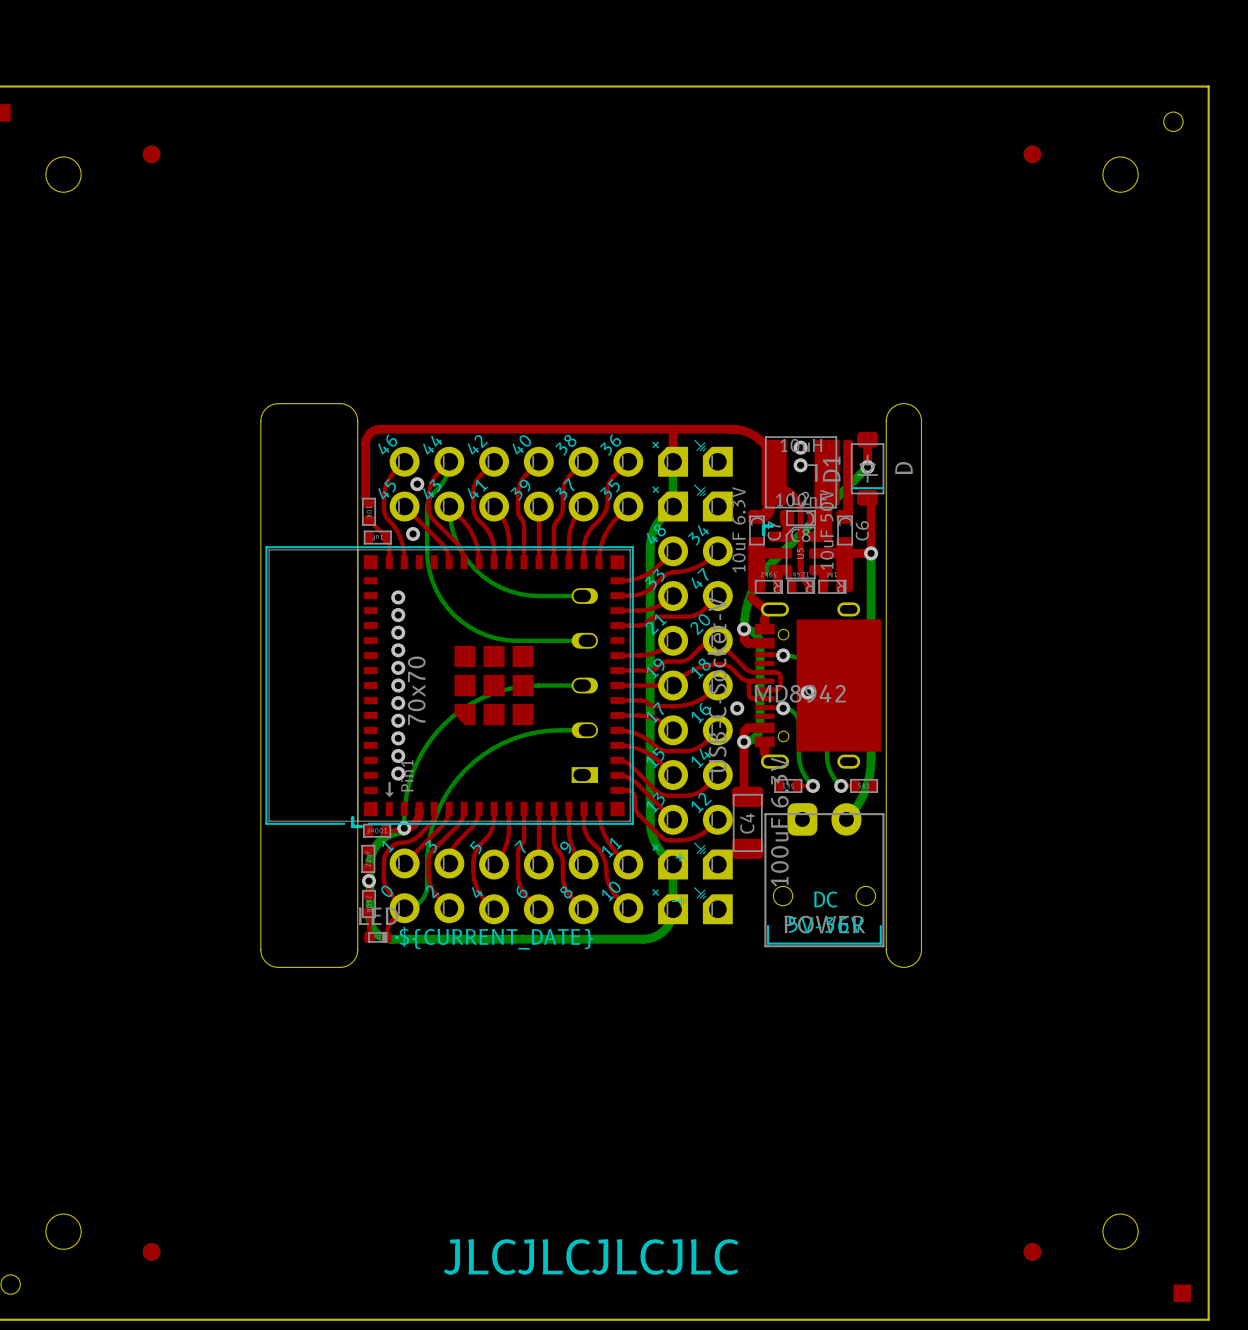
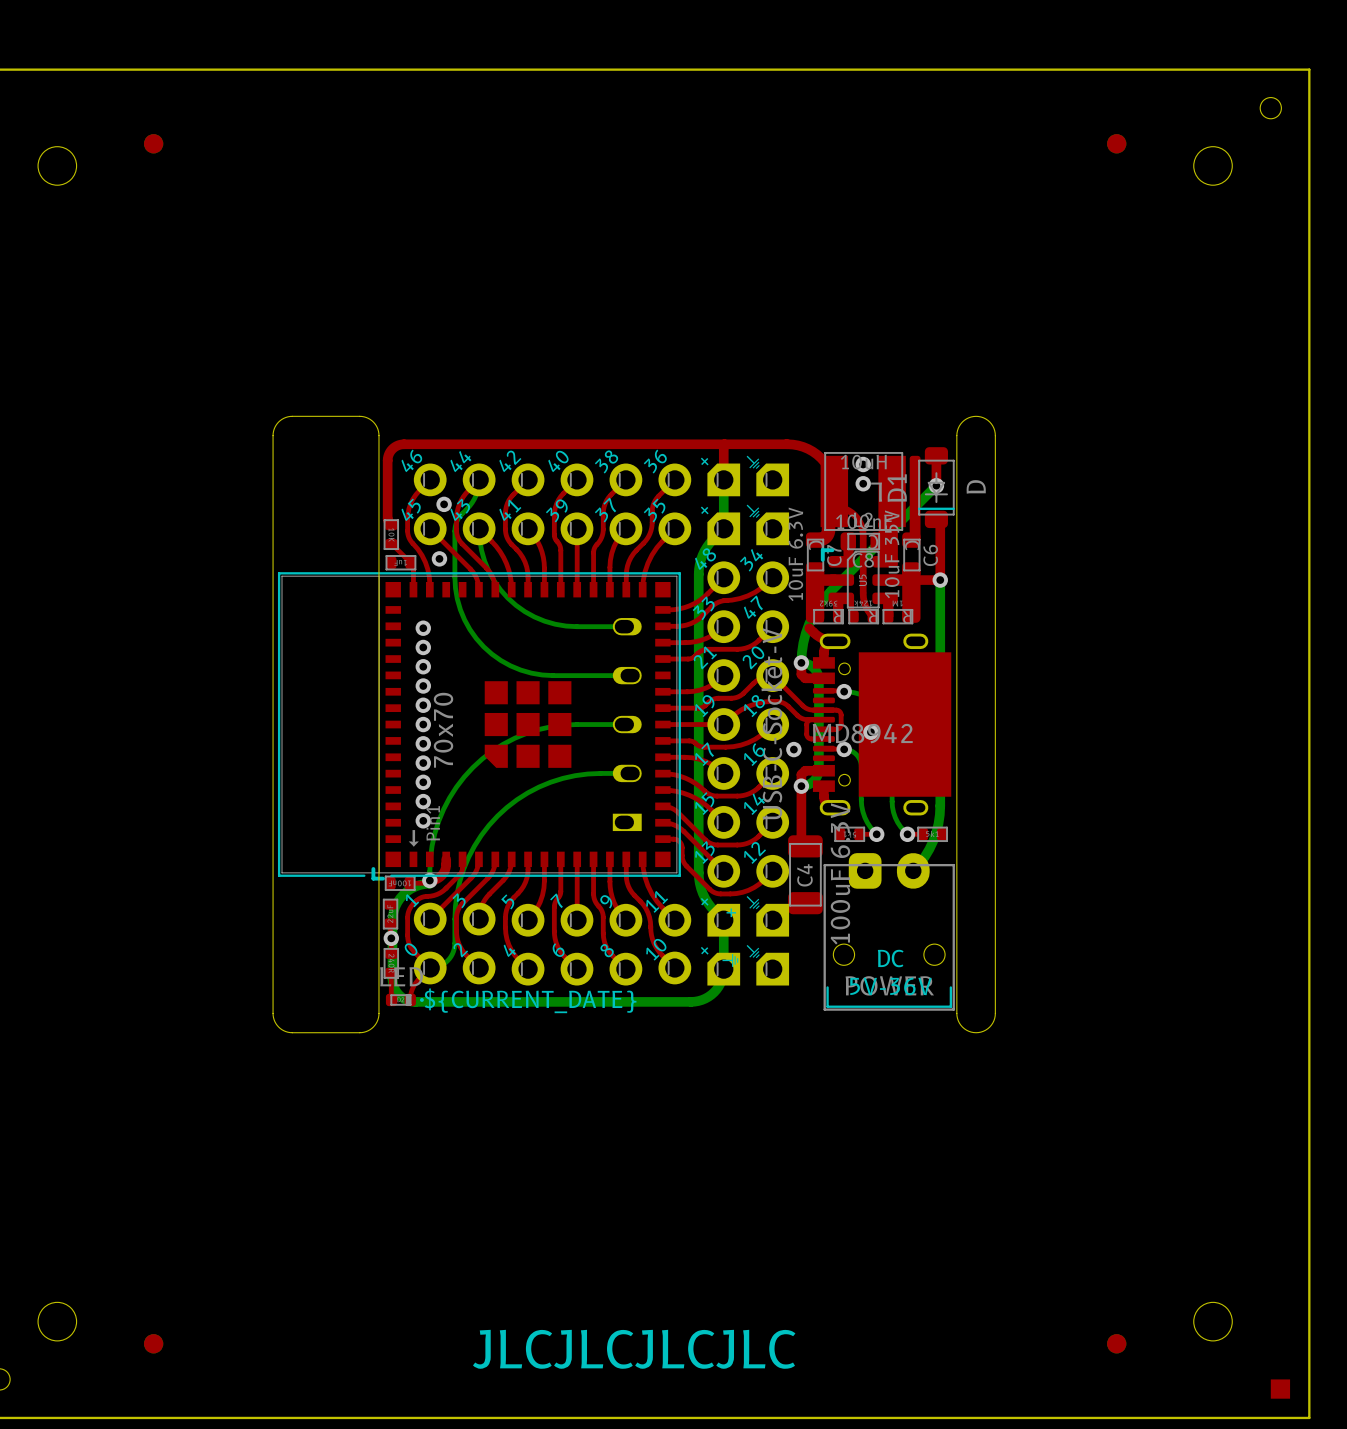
C6 value: 10uF 50V (827, 529) -> 10uF 35V (892, 554)

